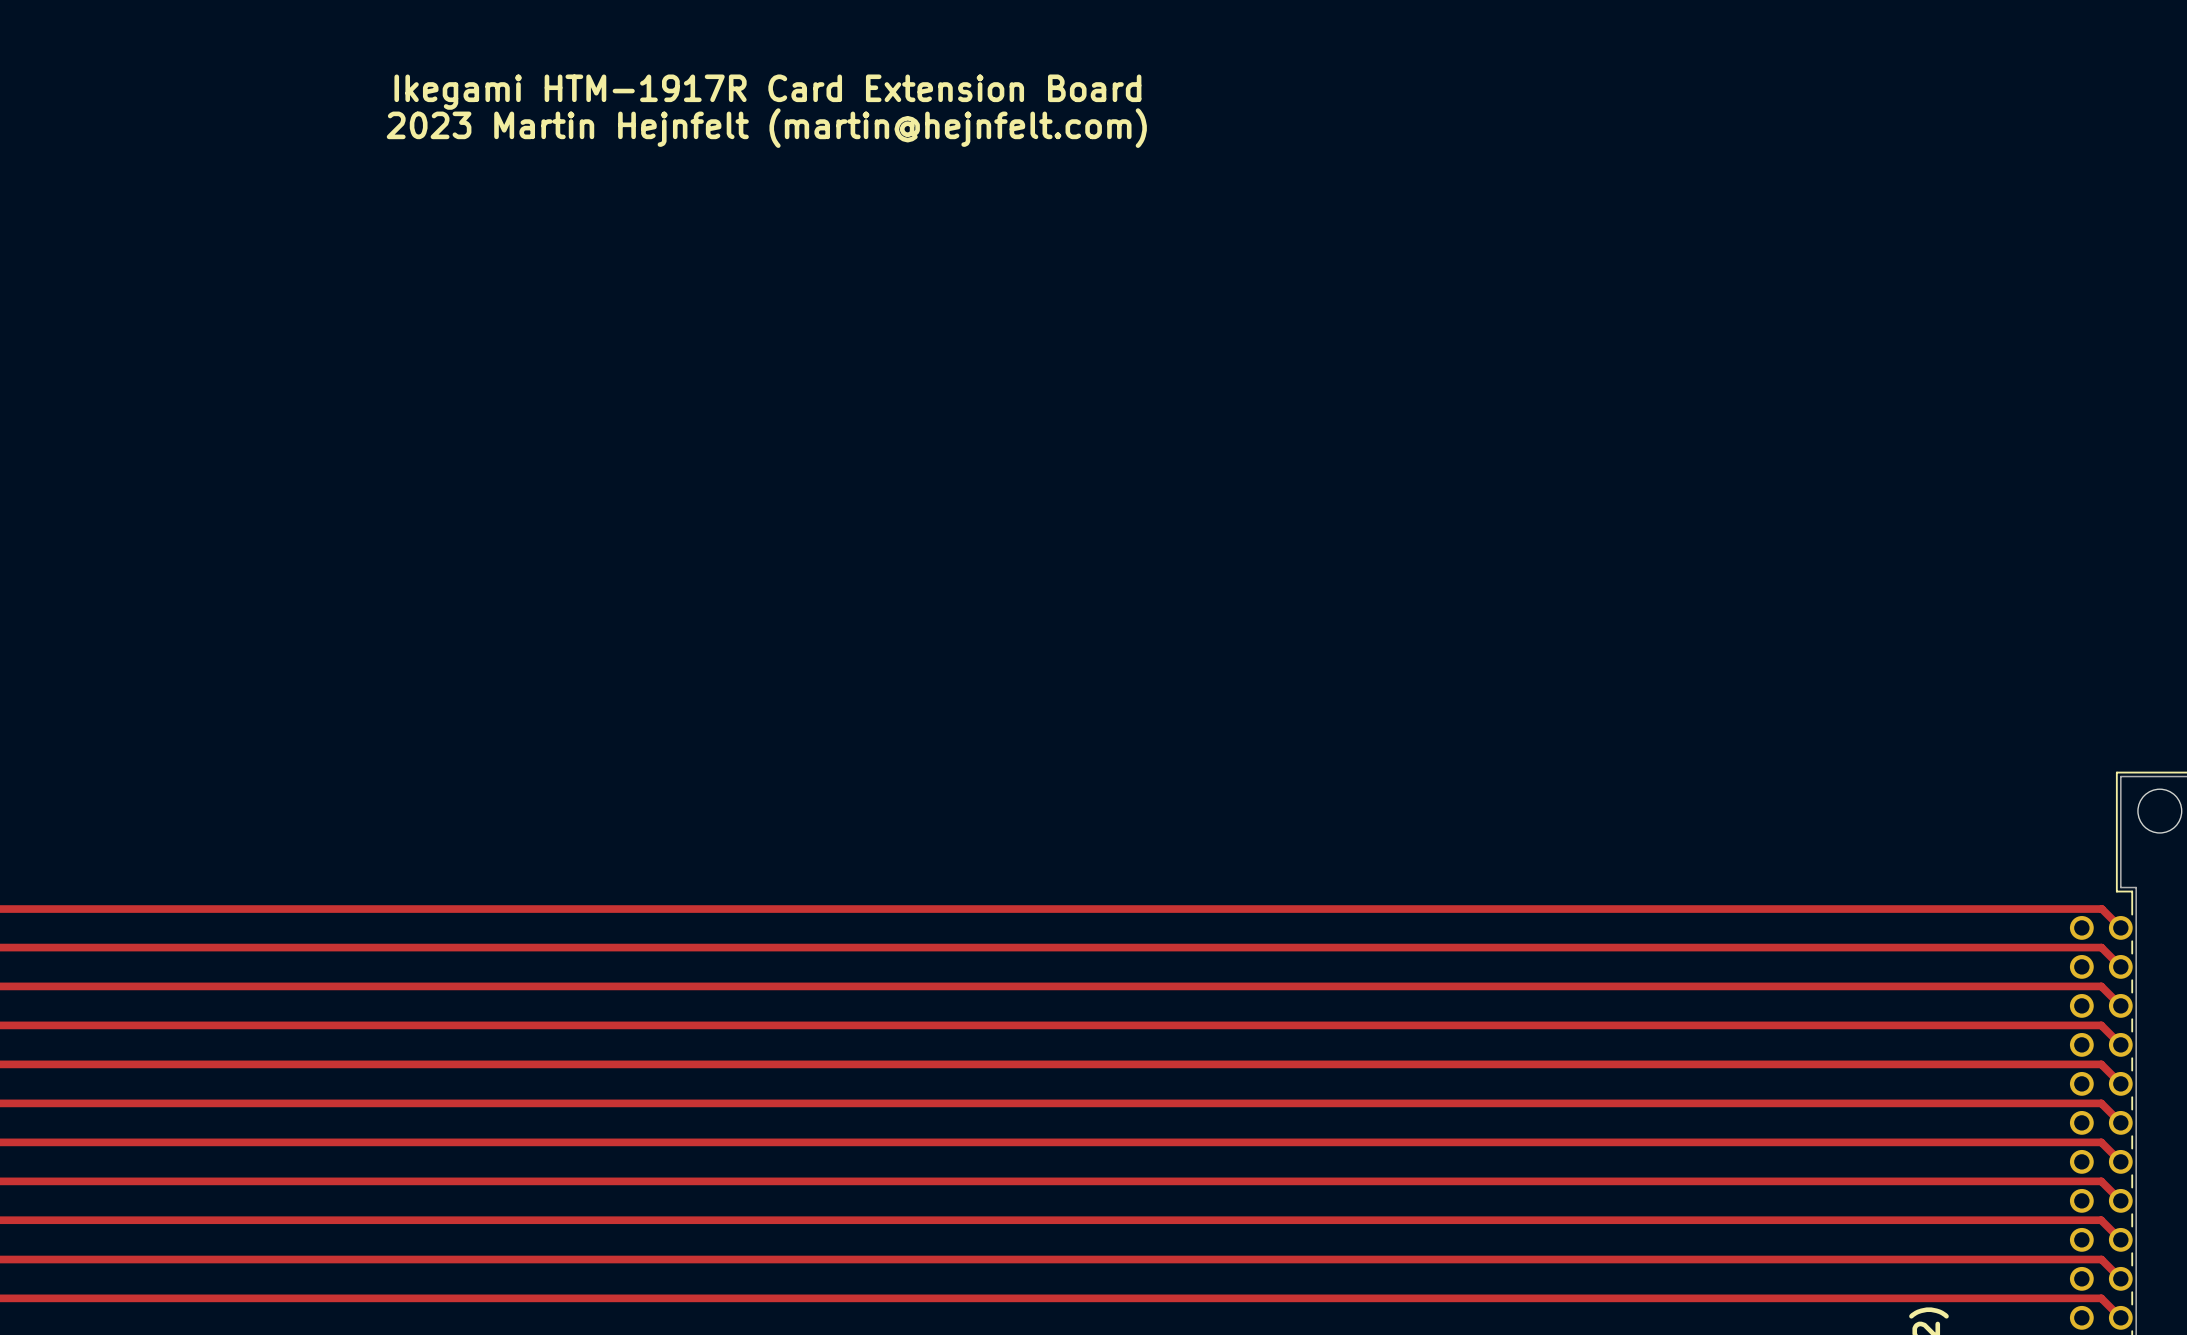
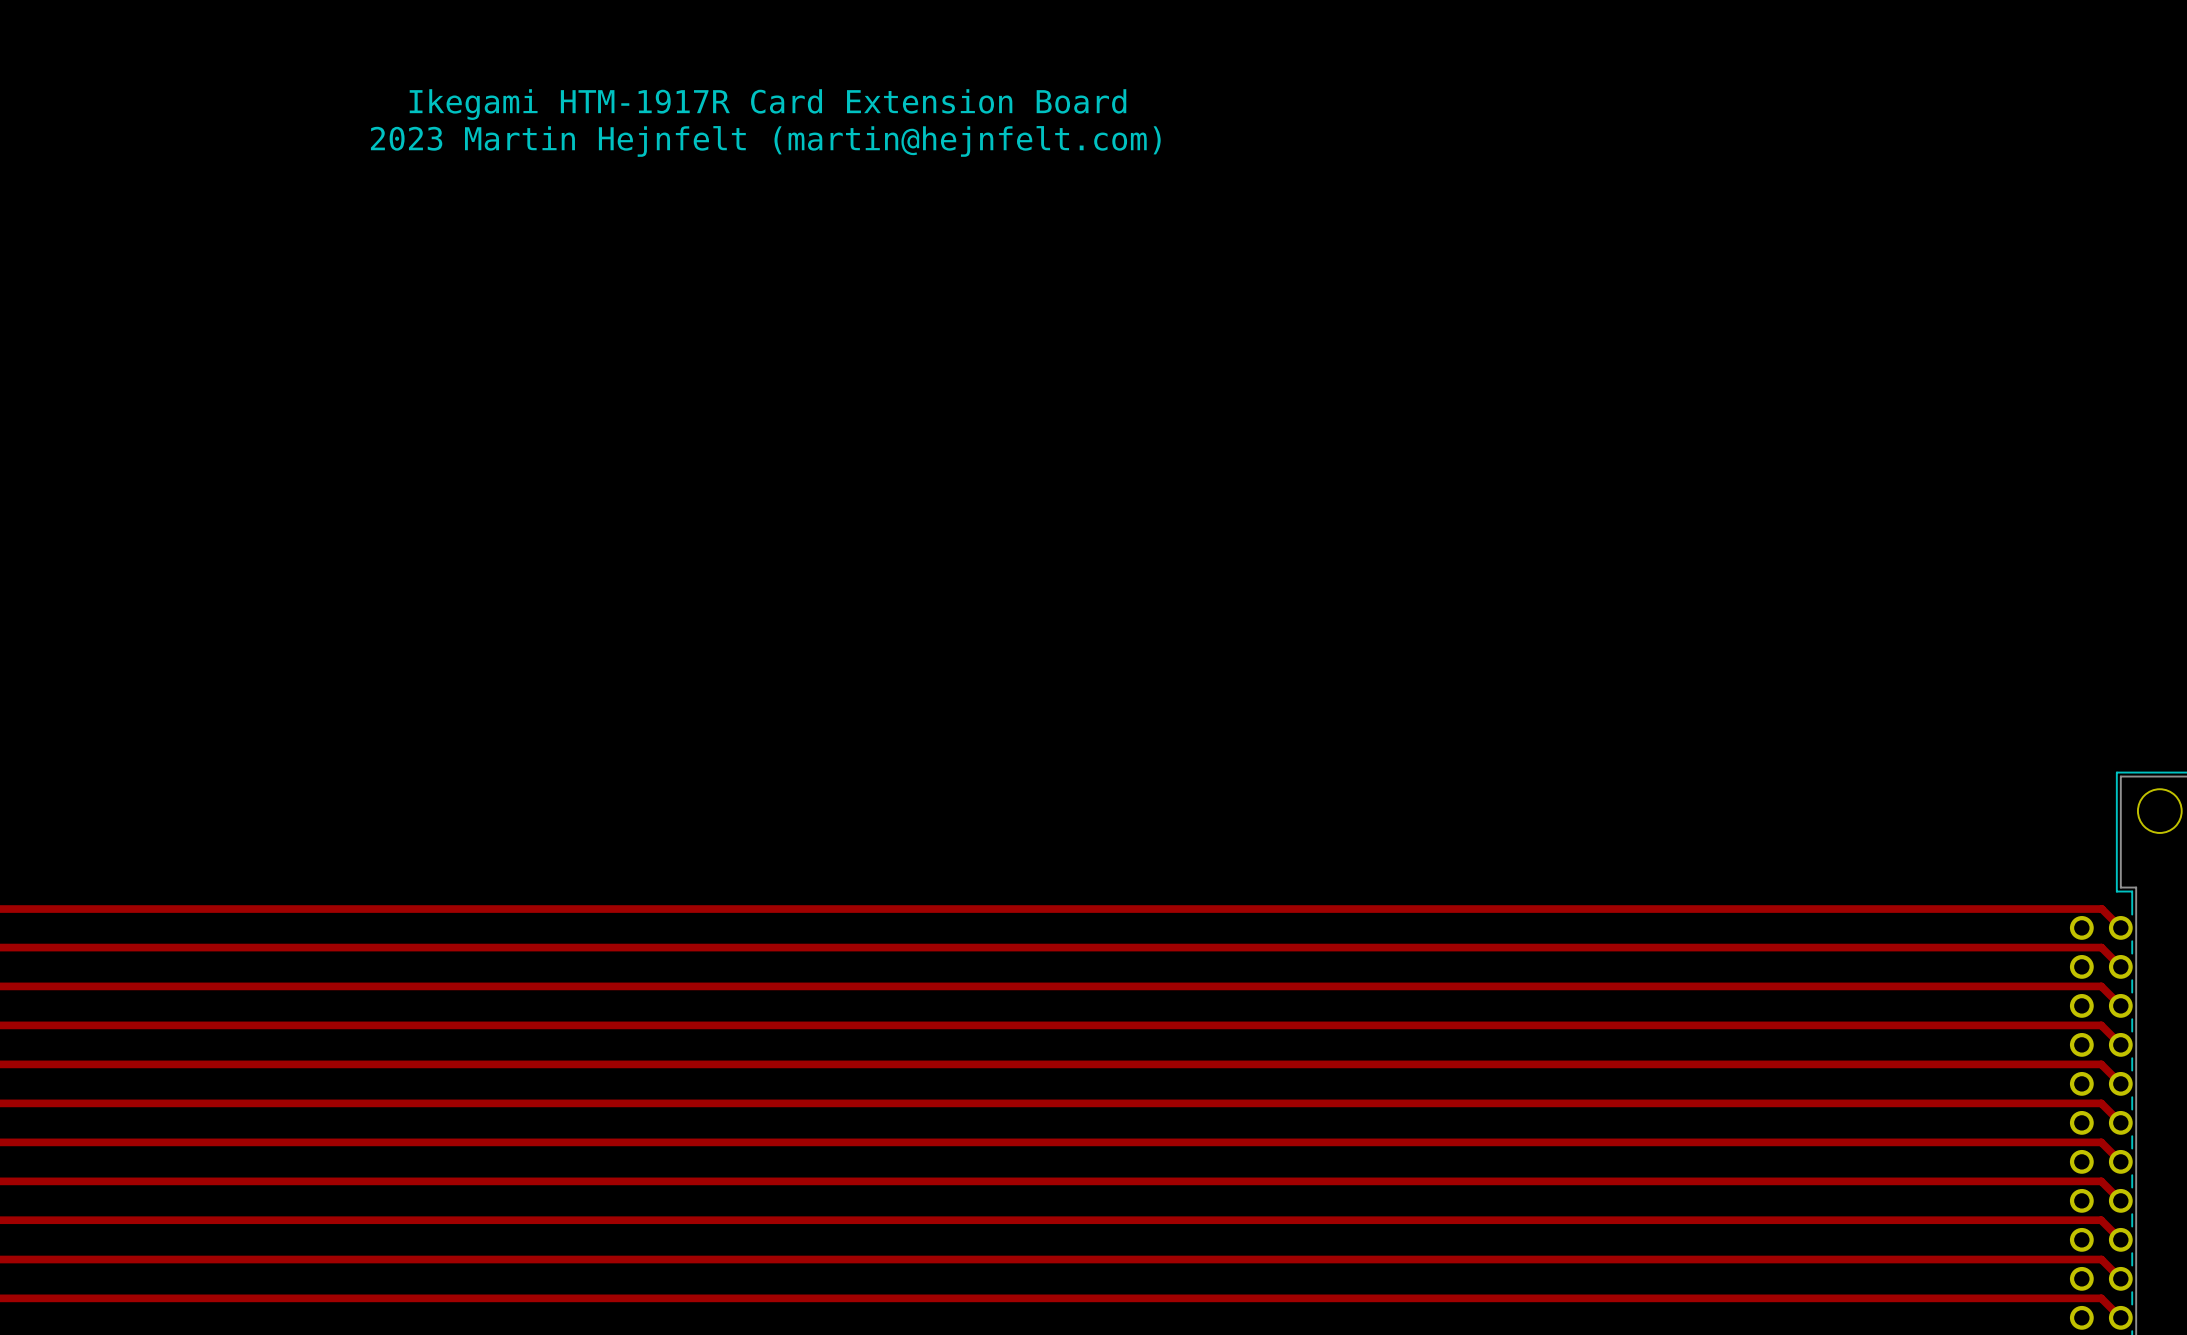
text position: Ikegami HTM-1917R Card Extension Board (767, 92) -> Ikegami HTM-1917R Card Extension Board (767, 104)
text position: 2023 Martin Hejnfelt (martin@hejnfelt.com) (766, 128) -> 2023 Martin Hejnfelt (martin@hejnfelt.com) (765, 141)

